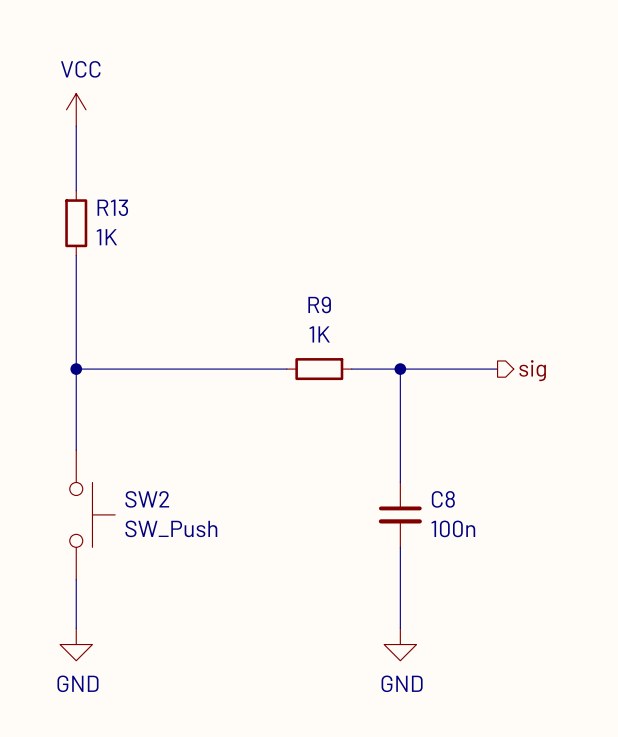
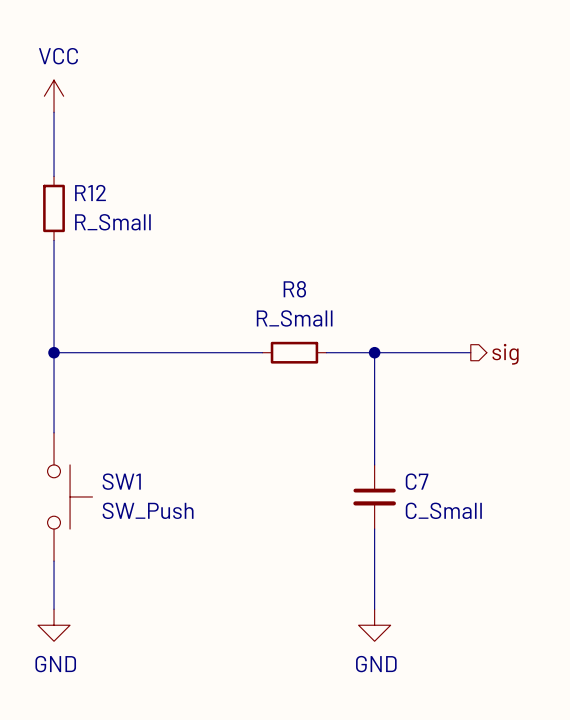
R13 name: R13 (112, 207) -> R12 (90, 192)
R13 value: 1K (106, 237) -> R_Small (112, 222)
R9 name: R9 (319, 304) -> R8 (294, 289)
R9 value: 1K (319, 334) -> R_Small (294, 318)
SW2 name: SW2 (147, 499) -> SW1 (121, 481)
C8 name: C8 (443, 499) -> C7 (417, 481)
C8 value: 100n (453, 528) -> C_Small (443, 510)

